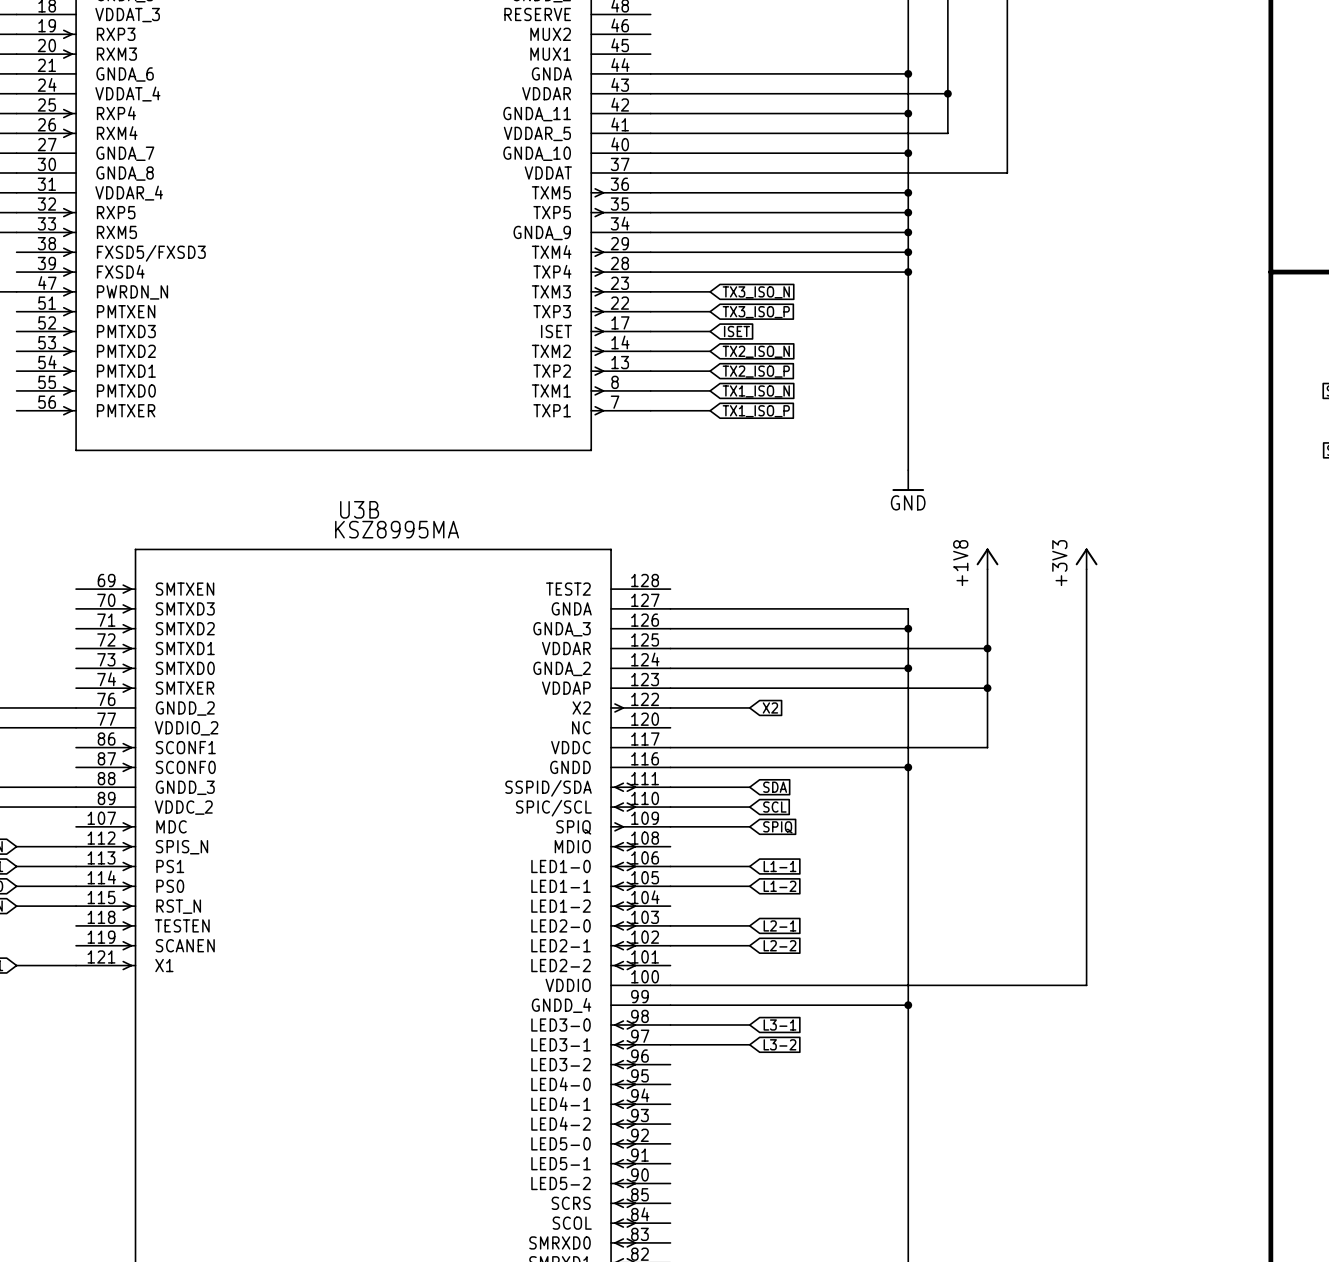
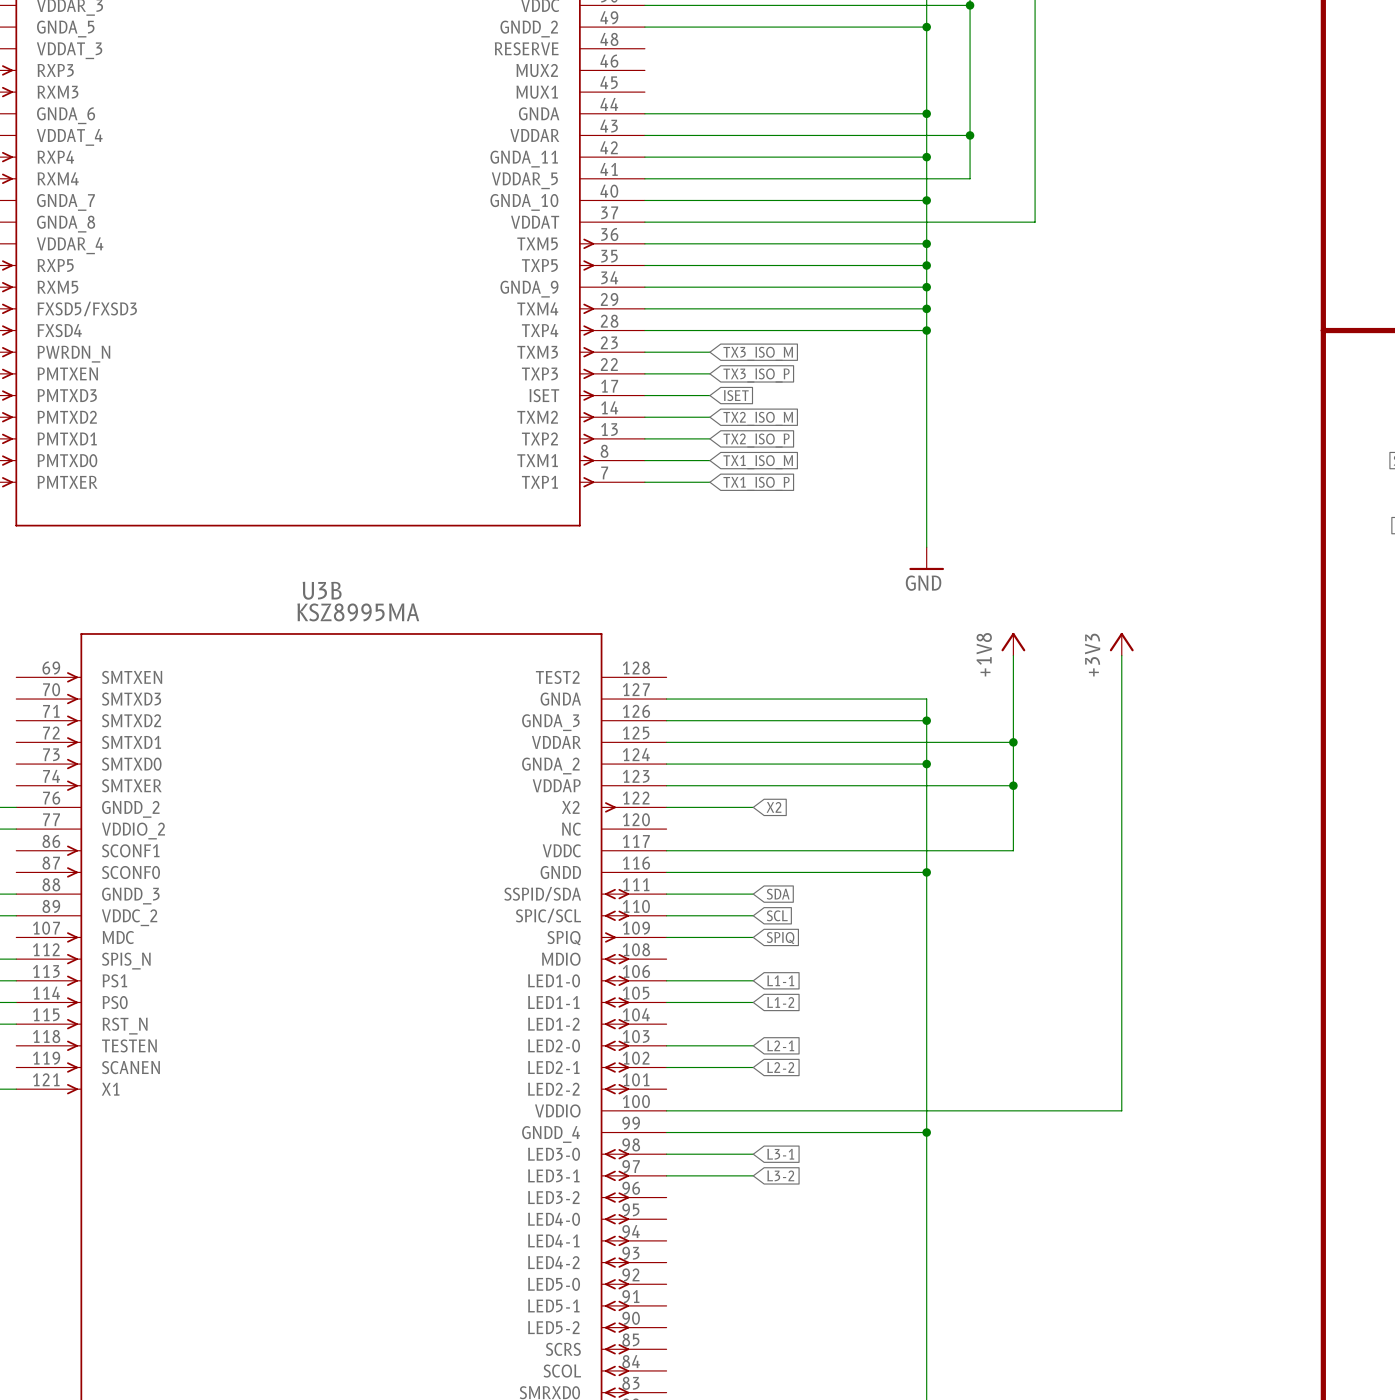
global label: TX3_ISO_N (756, 292) -> TX3_ISO_M (758, 353)
global label: TX2_ISO_N (756, 351) -> TX2_ISO_M (758, 418)
global label: TX1_ISO_N (756, 391) -> TX1_ISO_M (758, 462)

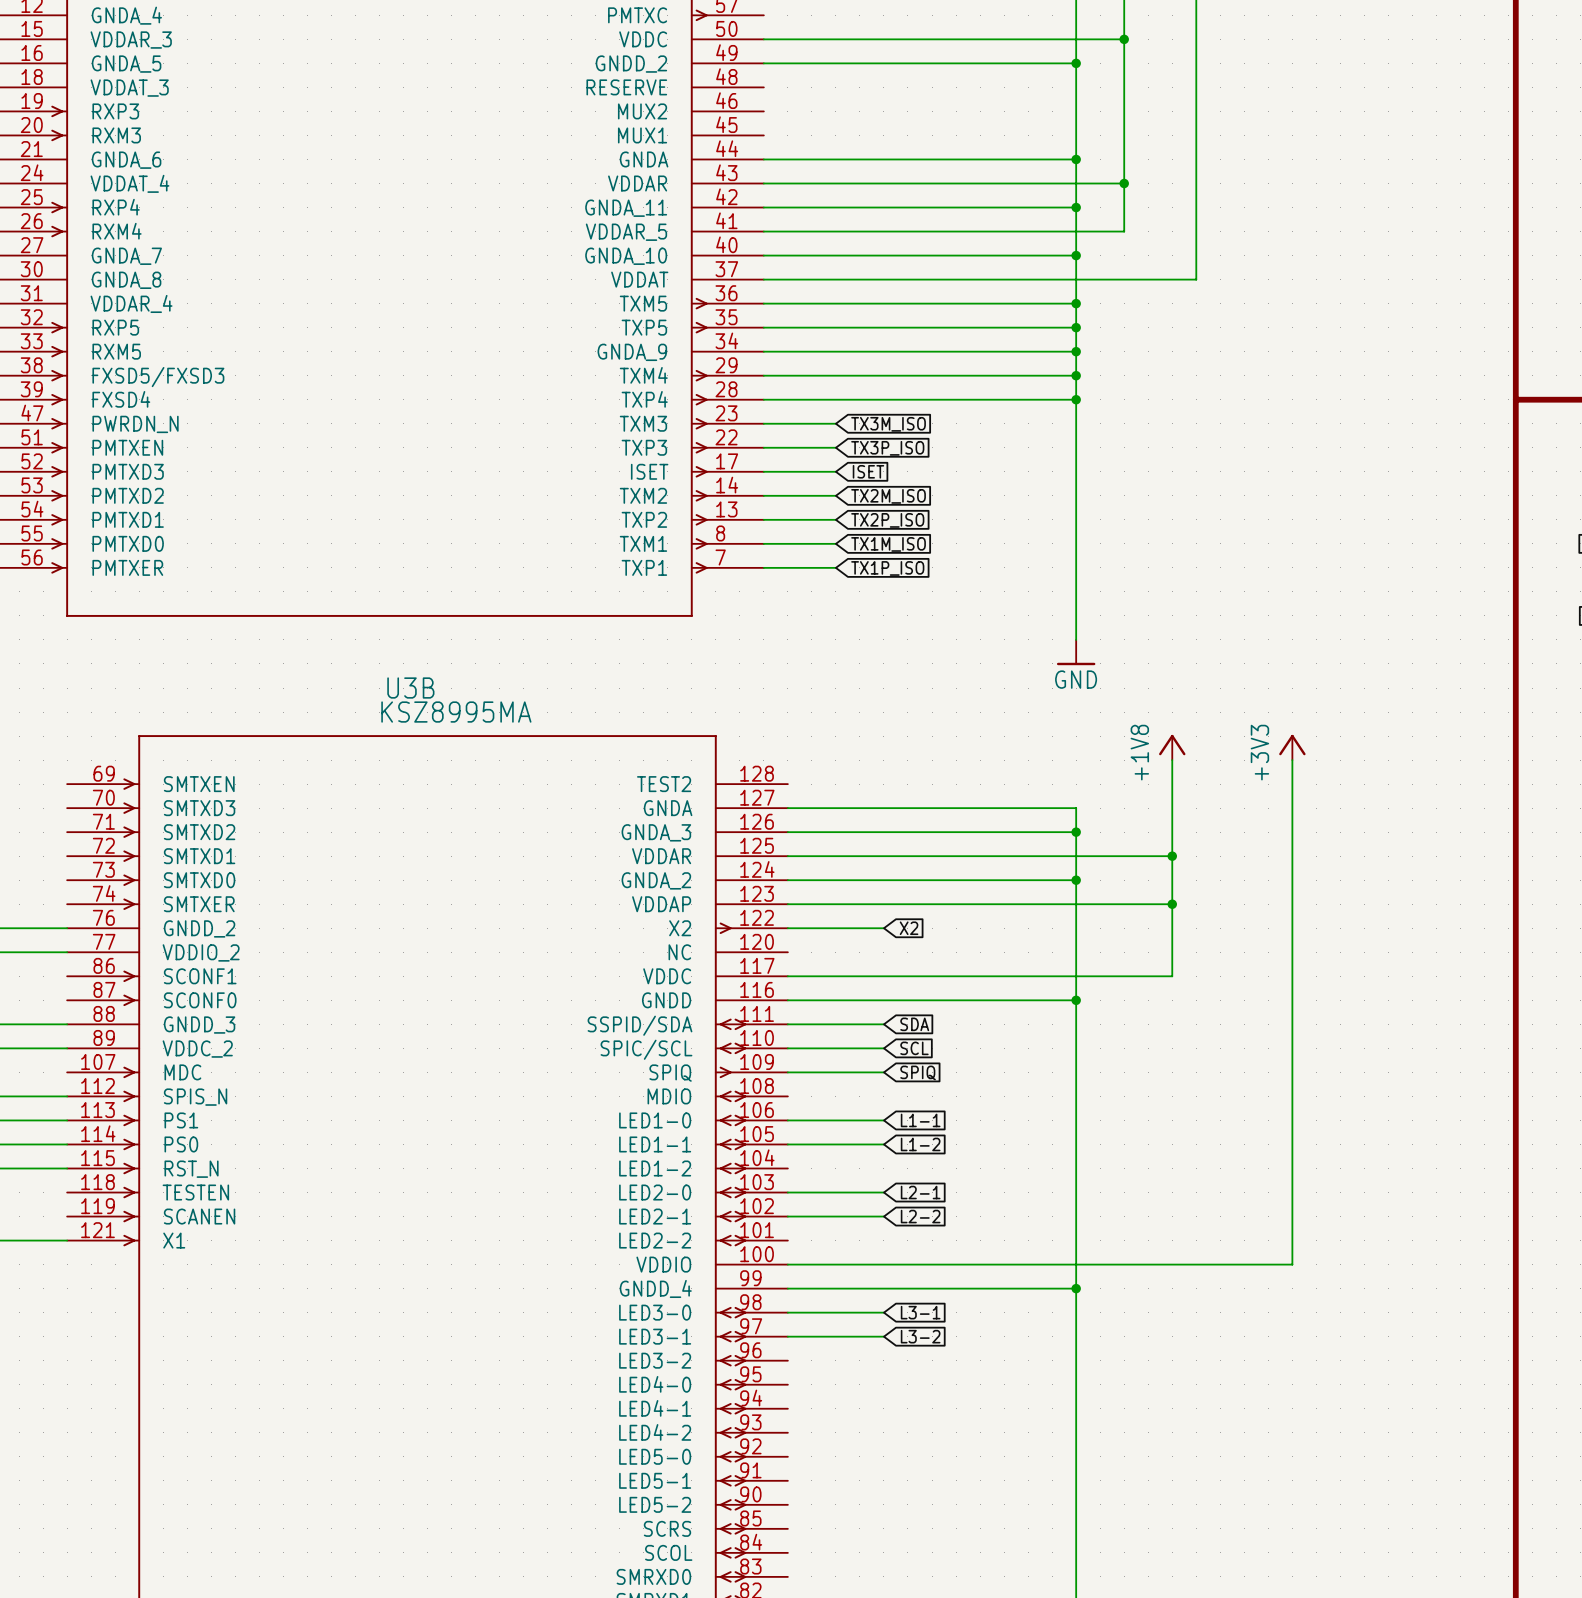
global label: TX3_ISO_M (758, 353) -> TX3M_ISO (888, 424)
global label: TX3_ISO_P (756, 375) -> TX3P_ISO (887, 448)
global label: TX2_ISO_M (758, 418) -> TX2M_ISO (888, 496)
global label: TX2_ISO_P (756, 440) -> TX2P_ISO (887, 520)
global label: TX1_ISO_M (758, 462) -> TX1M_ISO (888, 544)
global label: TX1_ISO_P (756, 483) -> TX1P_ISO (887, 568)

